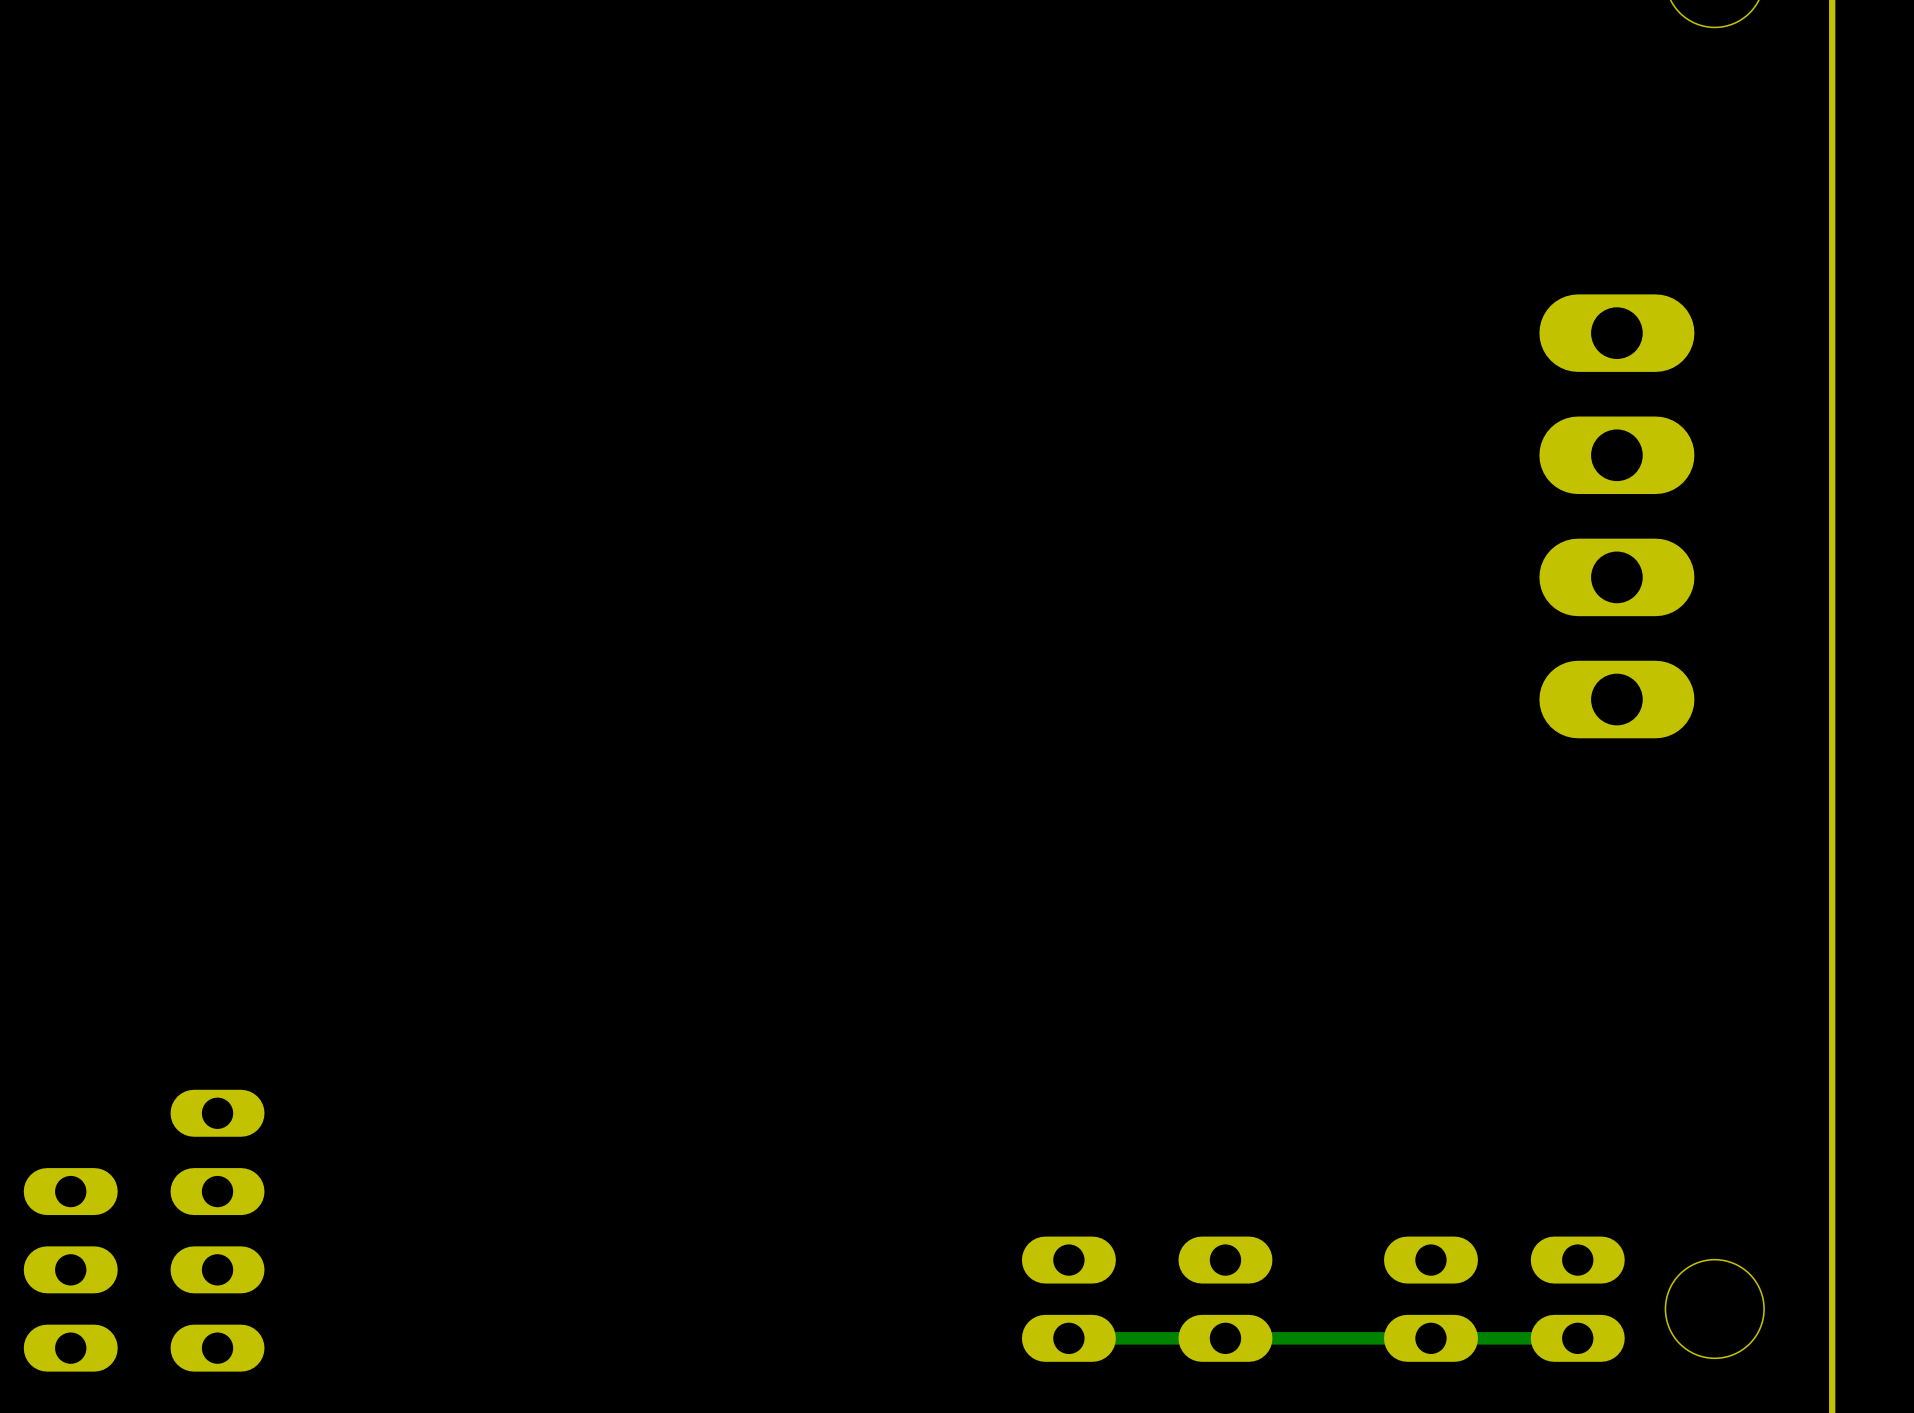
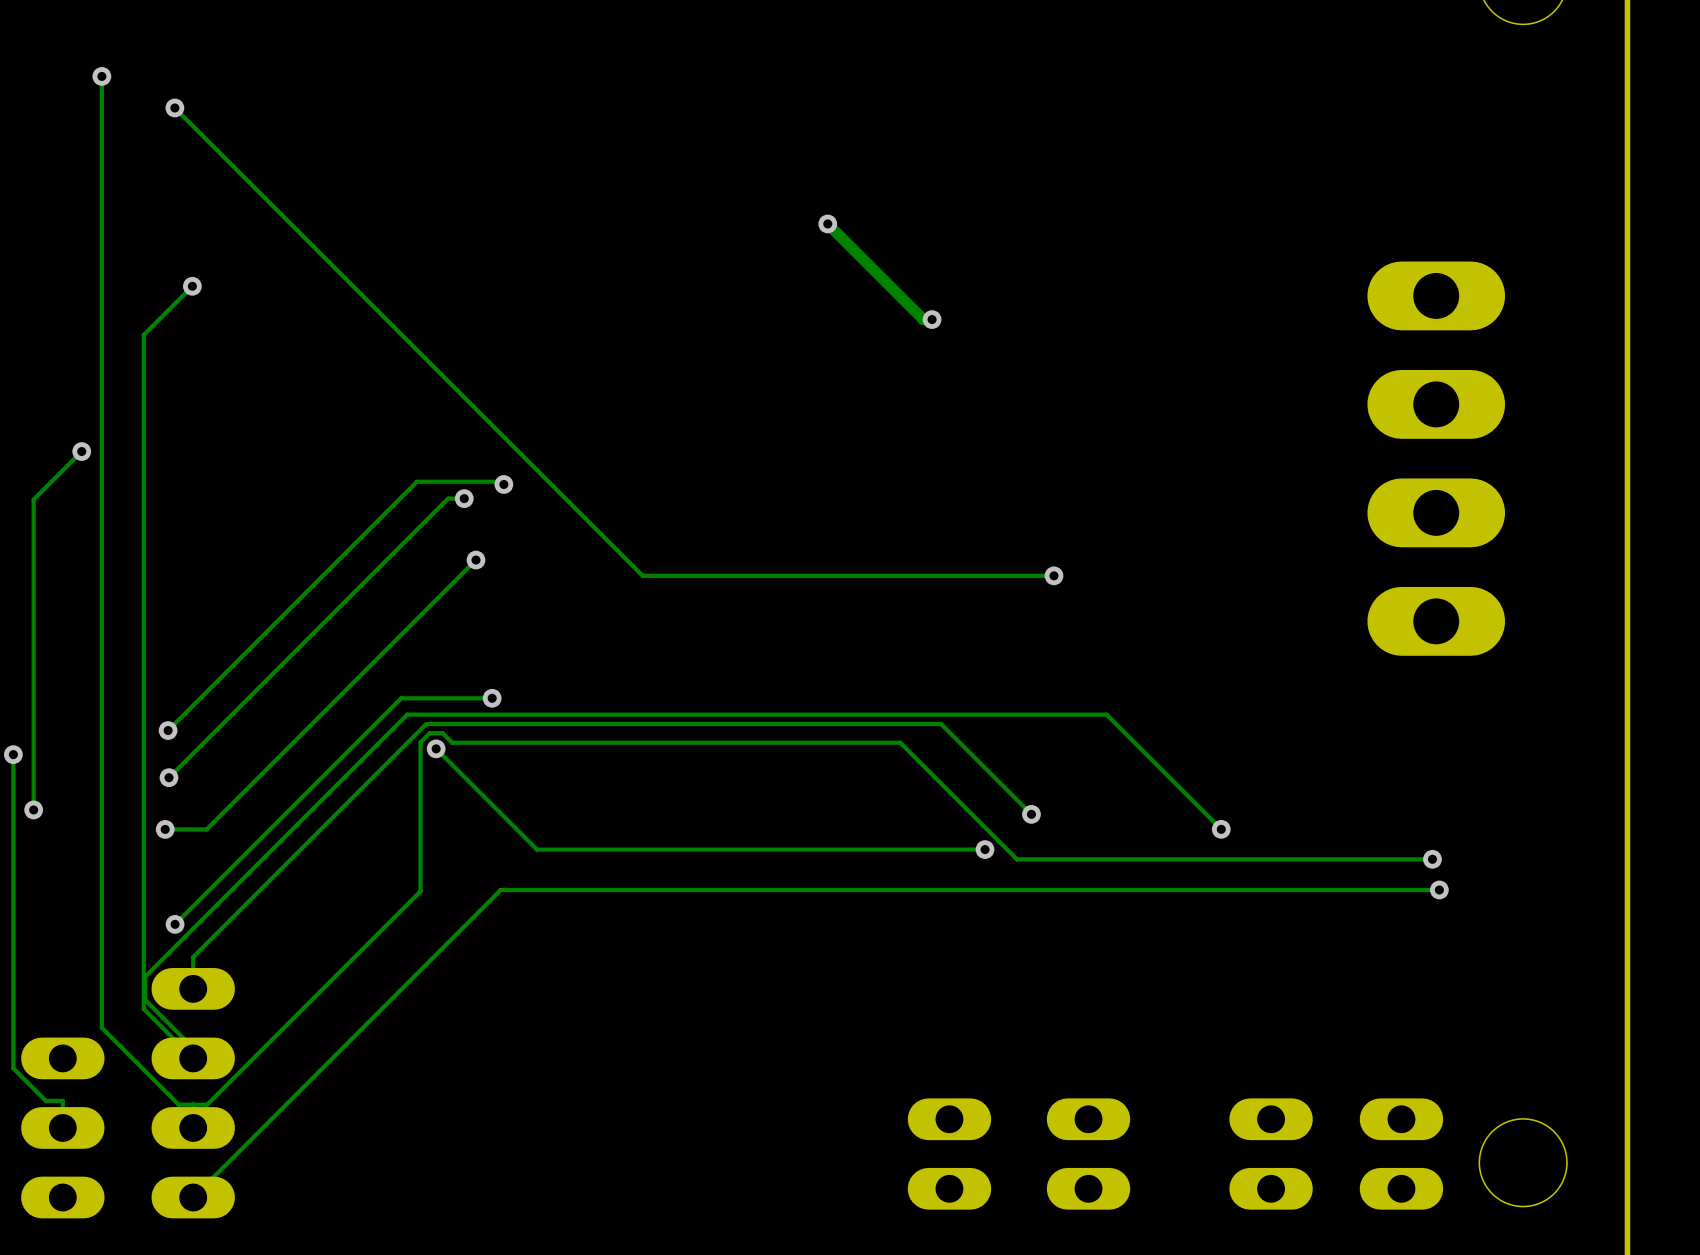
track: none -> (101, 76) (101, 1027) (178, 1104) (207, 1104) (420, 891) (420, 742) (429, 733) (442, 733) (452, 742) (900, 742) (1016, 859) (1432, 859)
via: none -> (101, 76)
track: none -> (174, 107) (642, 575) (1053, 575)
via: none -> (174, 107)
track: none -> (827, 223) (923, 319) (932, 319)
via: none -> (827, 223)
track: none -> (192, 286) (143, 334) (143, 1008) (193, 1058) (193, 1048) (145, 1000) (145, 976) (407, 714) (1106, 714) (1221, 829)
via: none -> (192, 286)
via: none -> (932, 319)
track: none -> (81, 451) (33, 499) (33, 809)
via: none -> (81, 451)
track: none -> (503, 484) (501, 481) (416, 481) (168, 730)
via: none -> (503, 484)
track: none -> (464, 498) (448, 498) (169, 777)
via: none -> (464, 498)
track: none -> (475, 560) (206, 829) (165, 829)
via: none -> (475, 560)
via: none -> (1053, 575)
track: none -> (492, 698) (401, 698) (175, 924)
via: none -> (492, 698)
via: none -> (168, 730)
track: none -> (436, 748) (536, 849) (985, 849)
via: none -> (436, 748)
track: none -> (13, 754) (13, 1068) (45, 1100) (62, 1100) (62, 1127)
via: none -> (13, 754)
via: none -> (169, 777)
via: none -> (33, 809)
track: none -> (1031, 814) (941, 724) (426, 724) (193, 957) (193, 988)
via: none -> (1031, 814)
via: none -> (165, 829)
via: none -> (1221, 829)
via: none -> (985, 849)
via: none -> (1432, 859)
track: none -> (1439, 889) (500, 889) (193, 1197)
via: none -> (1439, 889)
via: none -> (175, 924)
track: (1577, 1338) (1068, 1338) -> none

